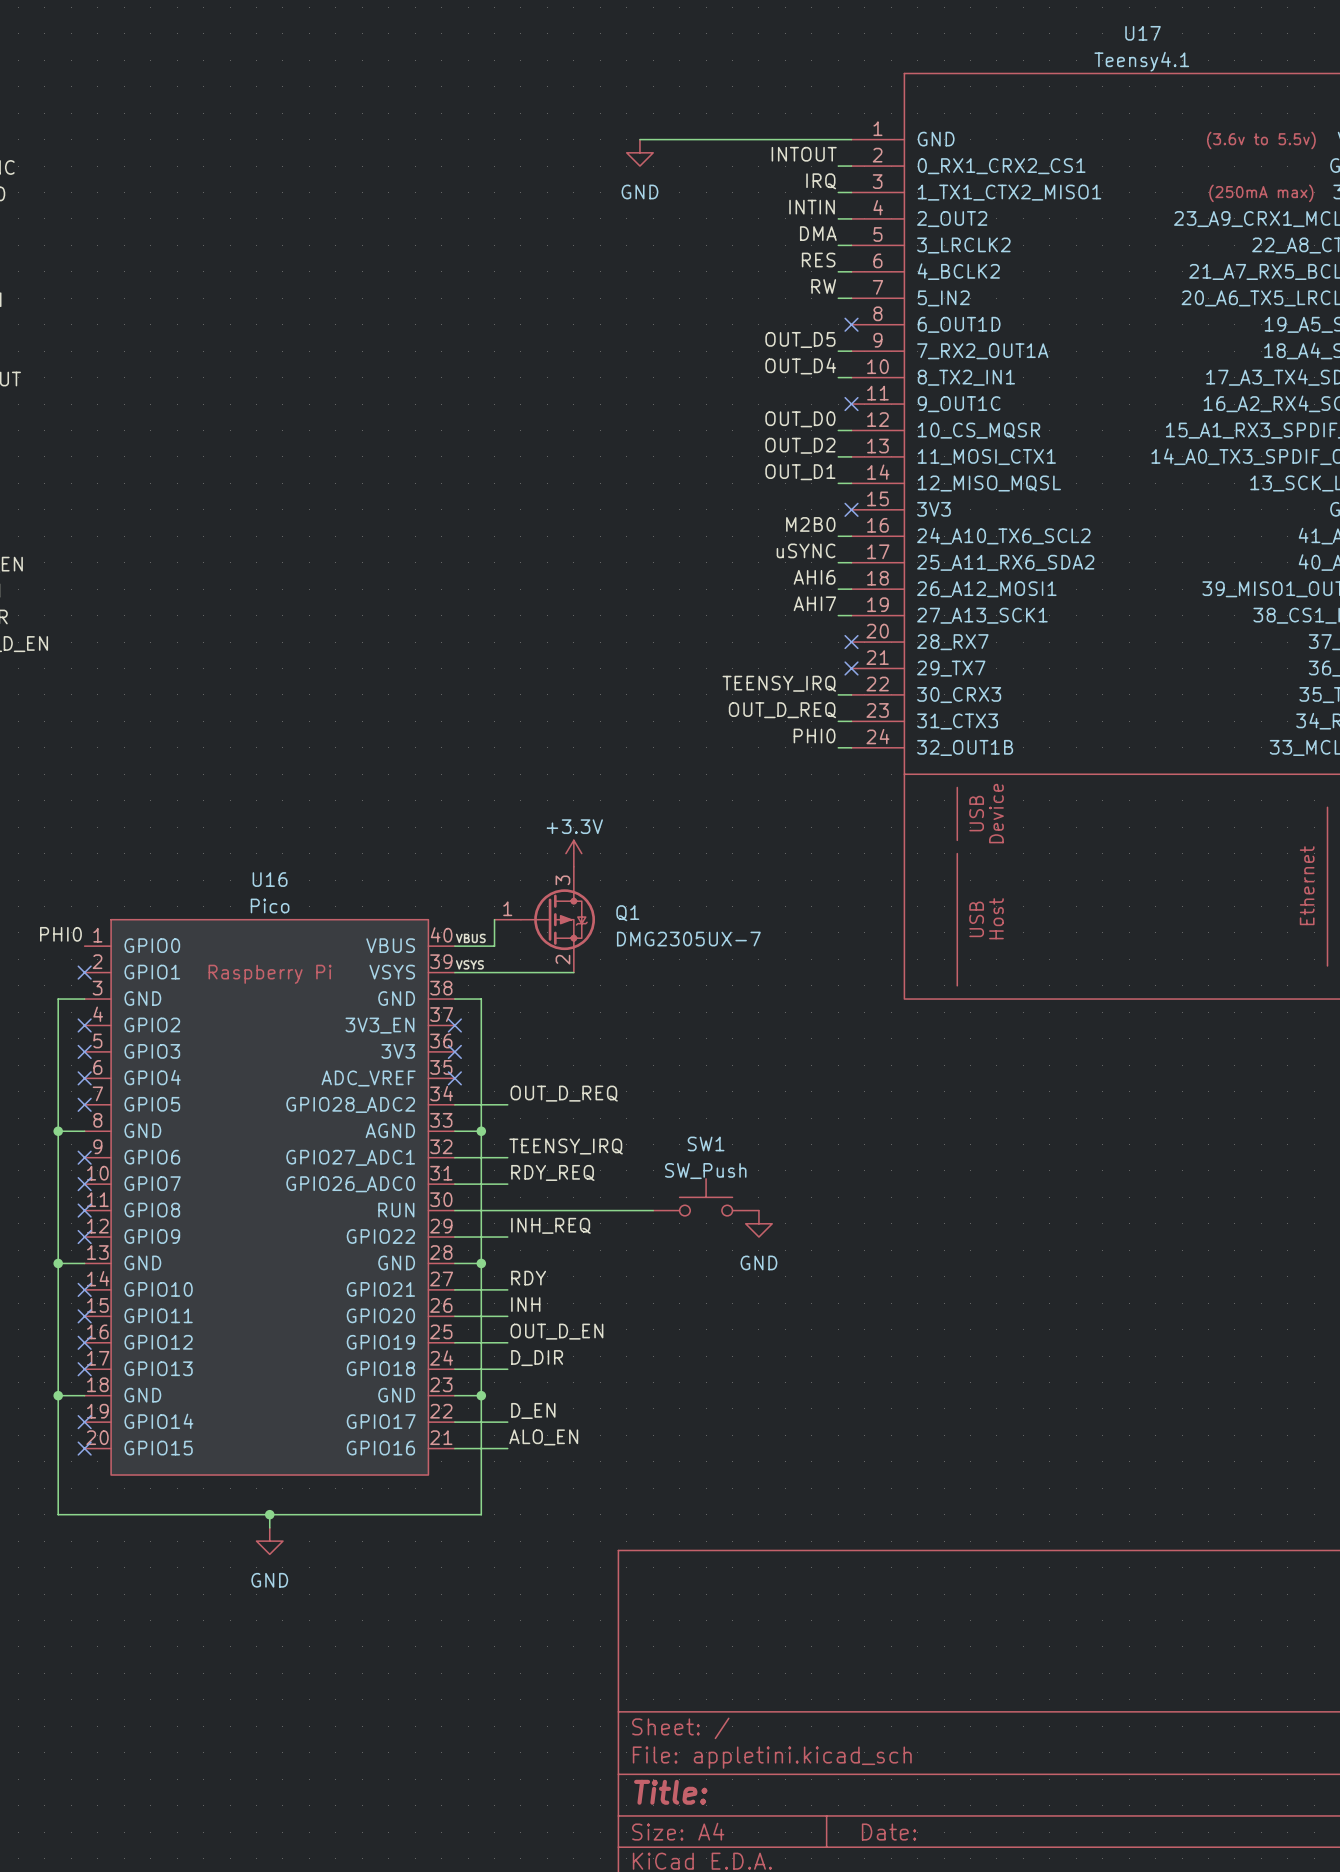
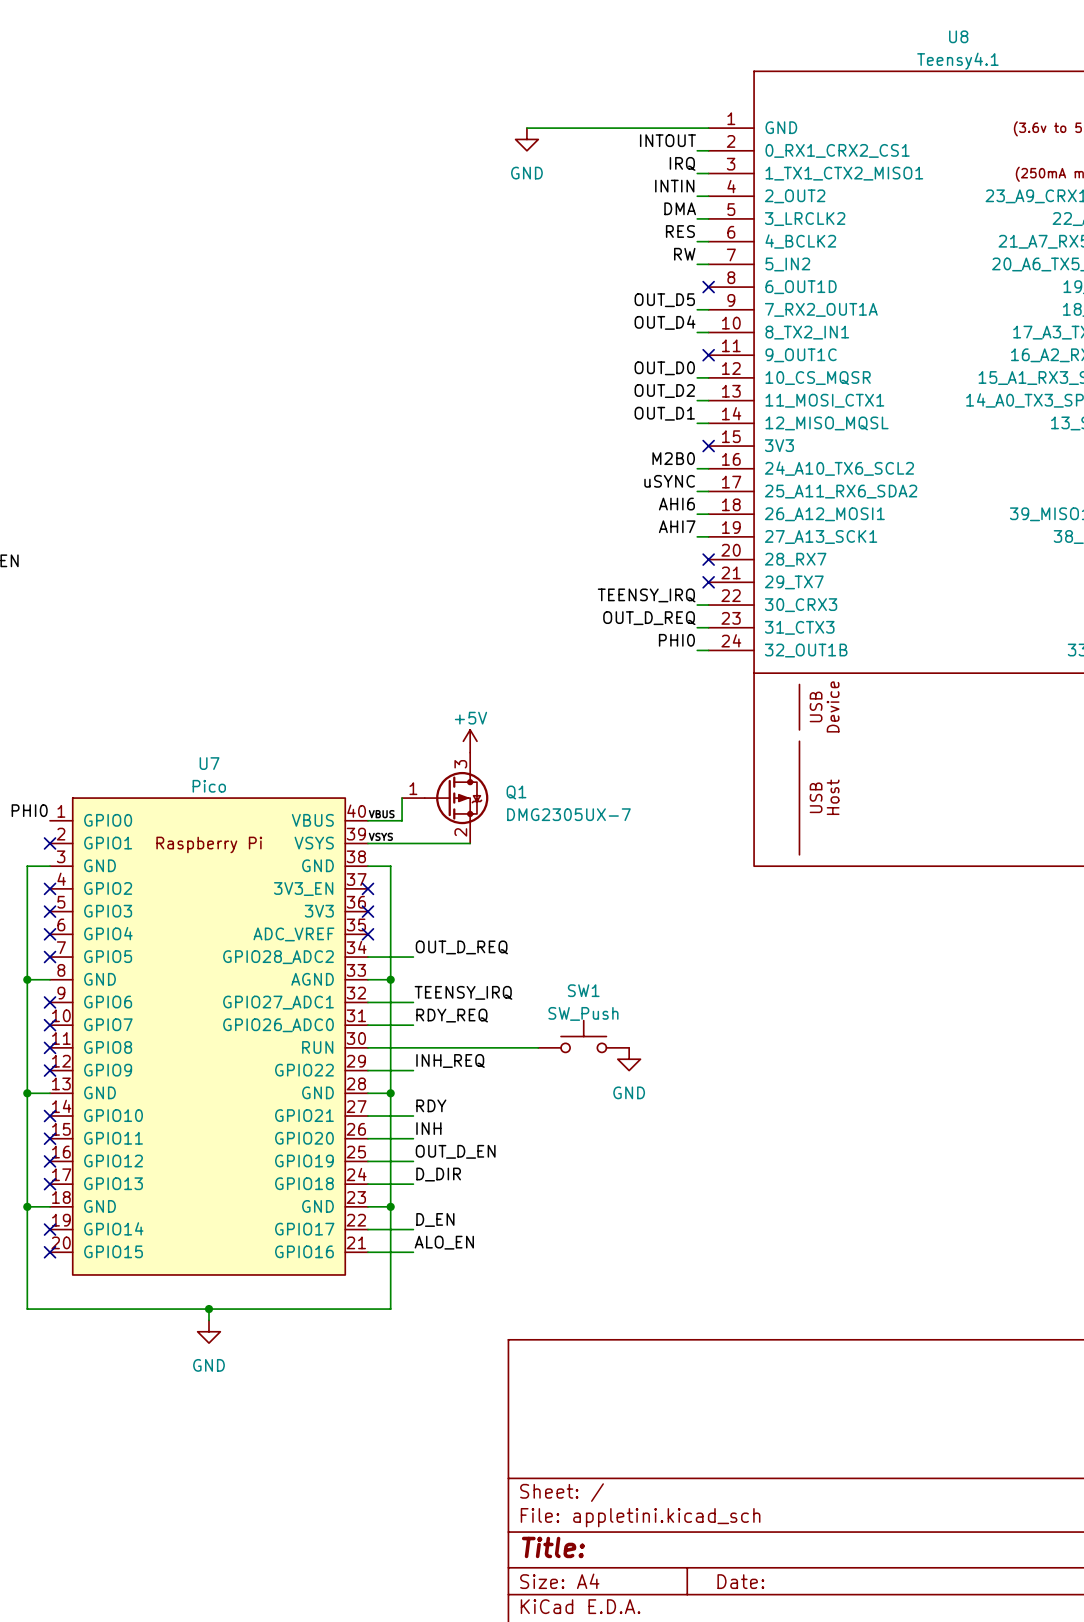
U17 name: U17 (1143, 33) -> U8 (958, 36)
power symbol: +3.3V (573, 853) -> +5V (470, 741)
U16 name: U16 (270, 879) -> U7 (209, 763)

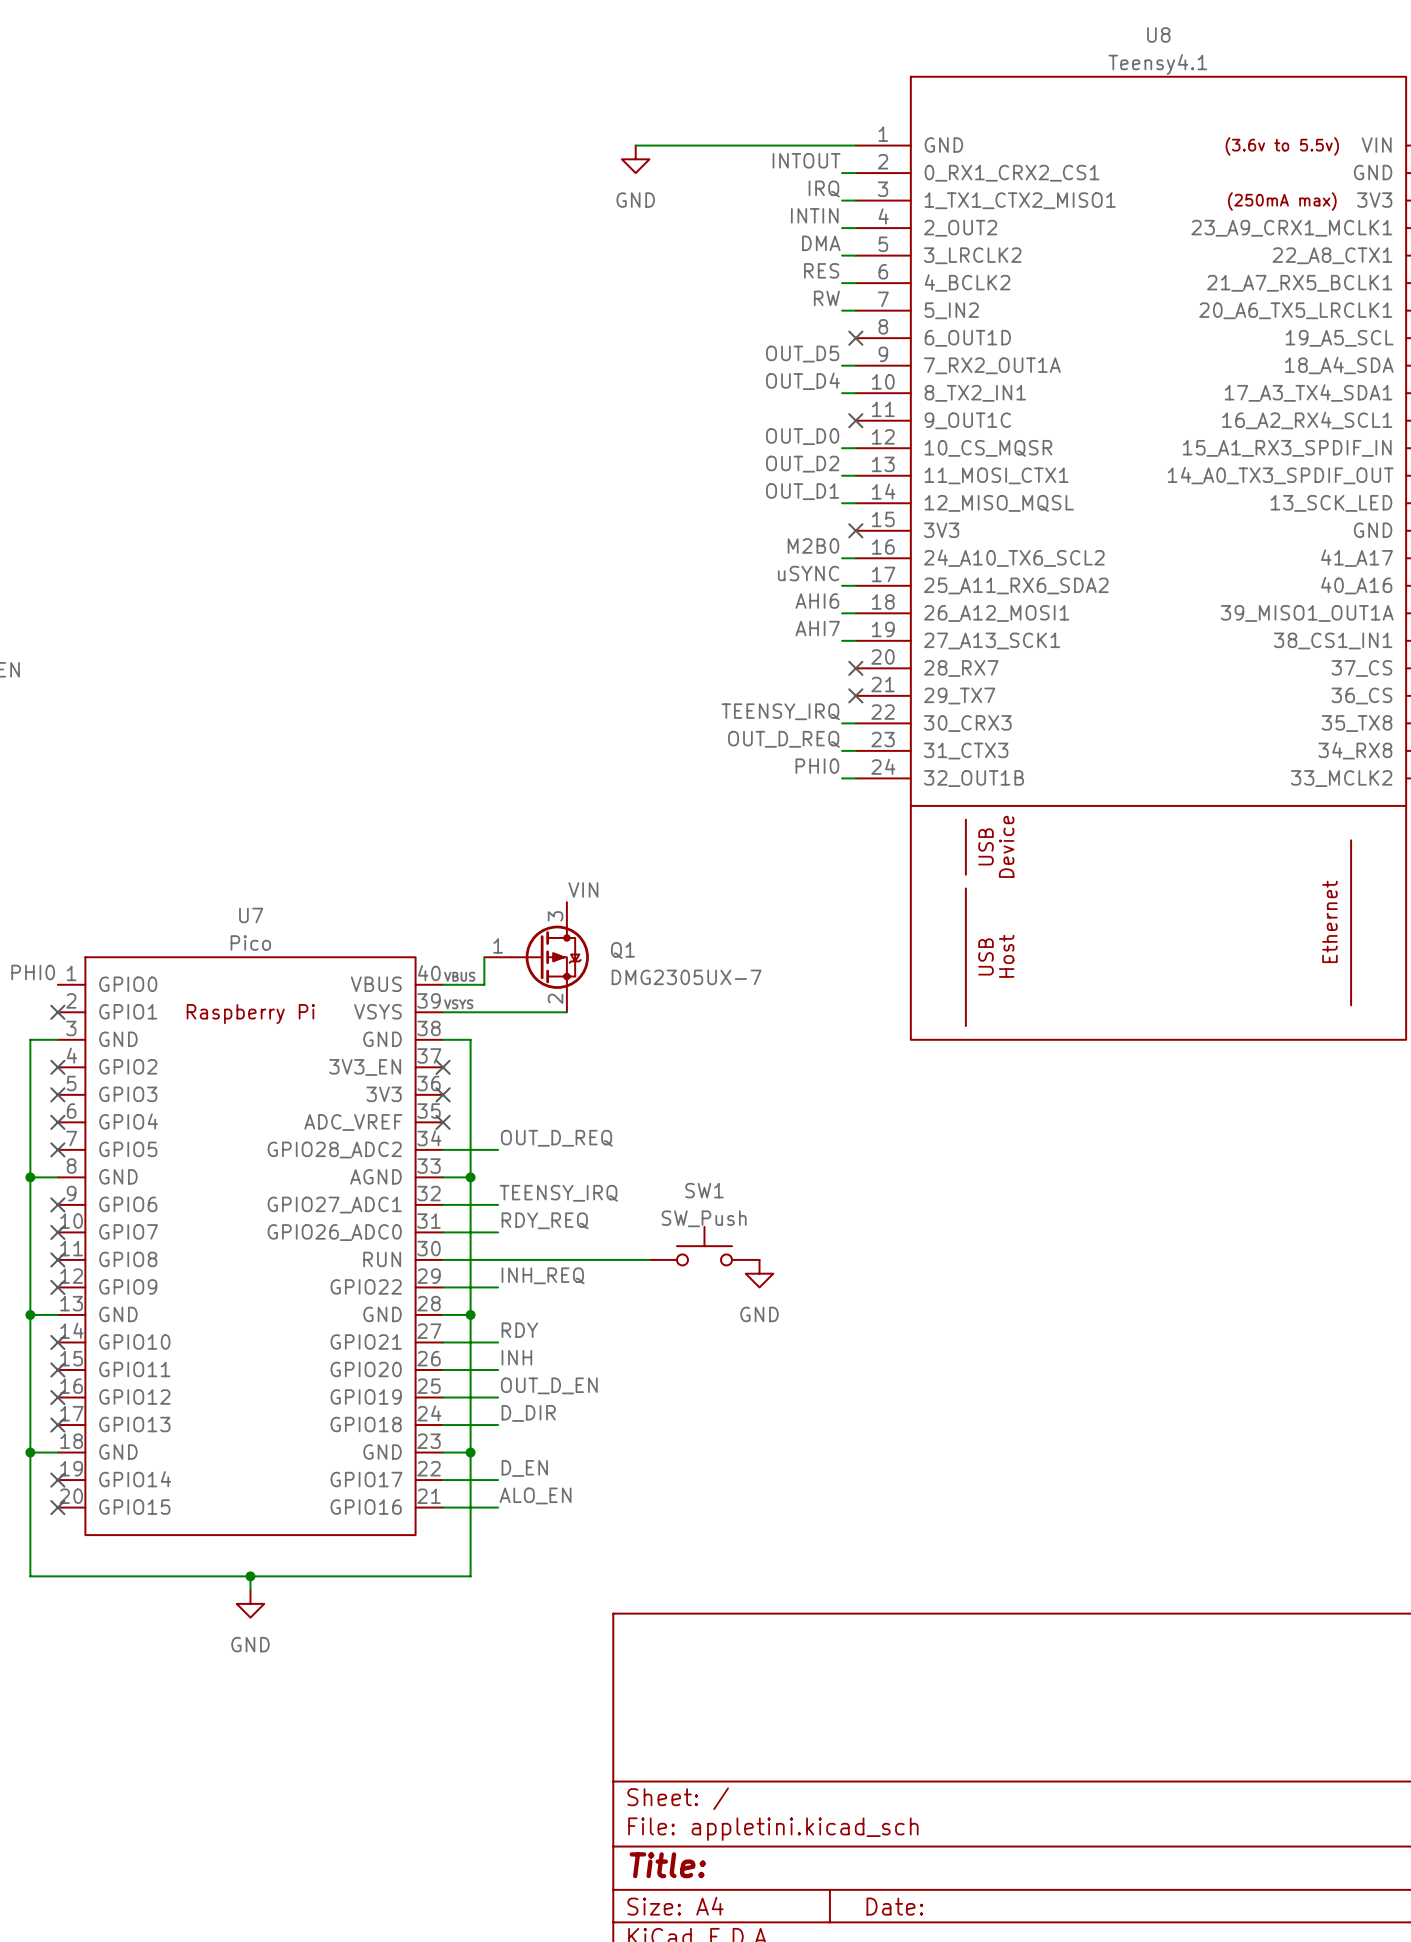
power symbol: +5V (470, 741) -> none
label: none -> VIN (583, 889)

